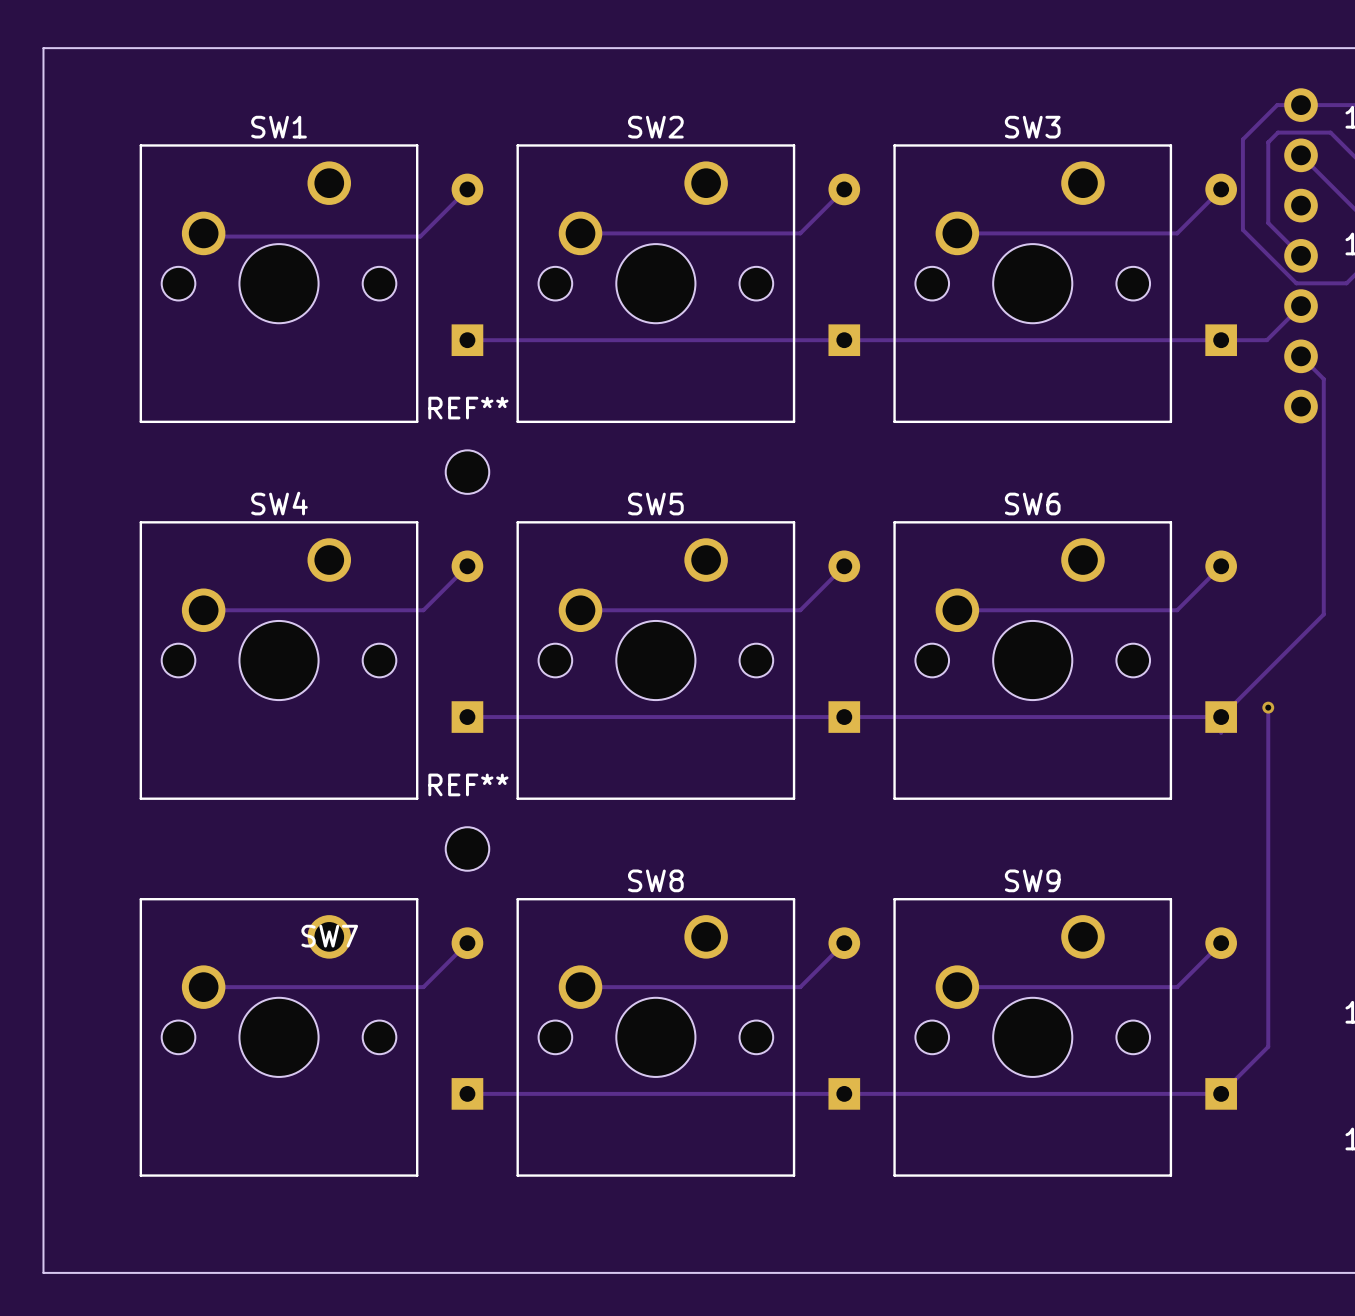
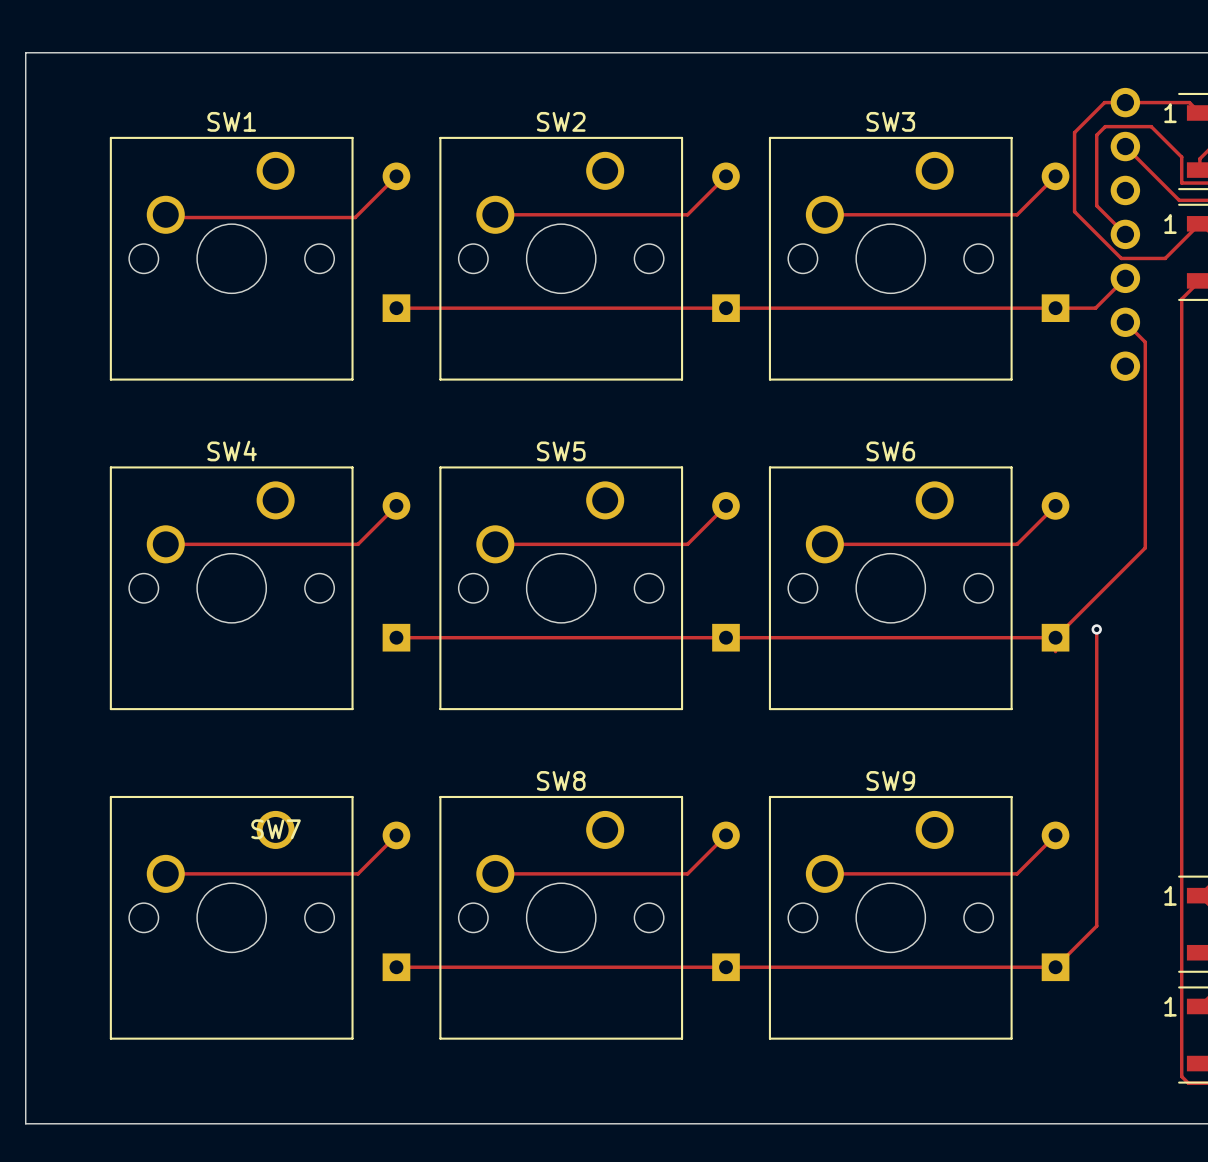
REF**: (467, 472) -> none
REF**: (467, 848) -> none

